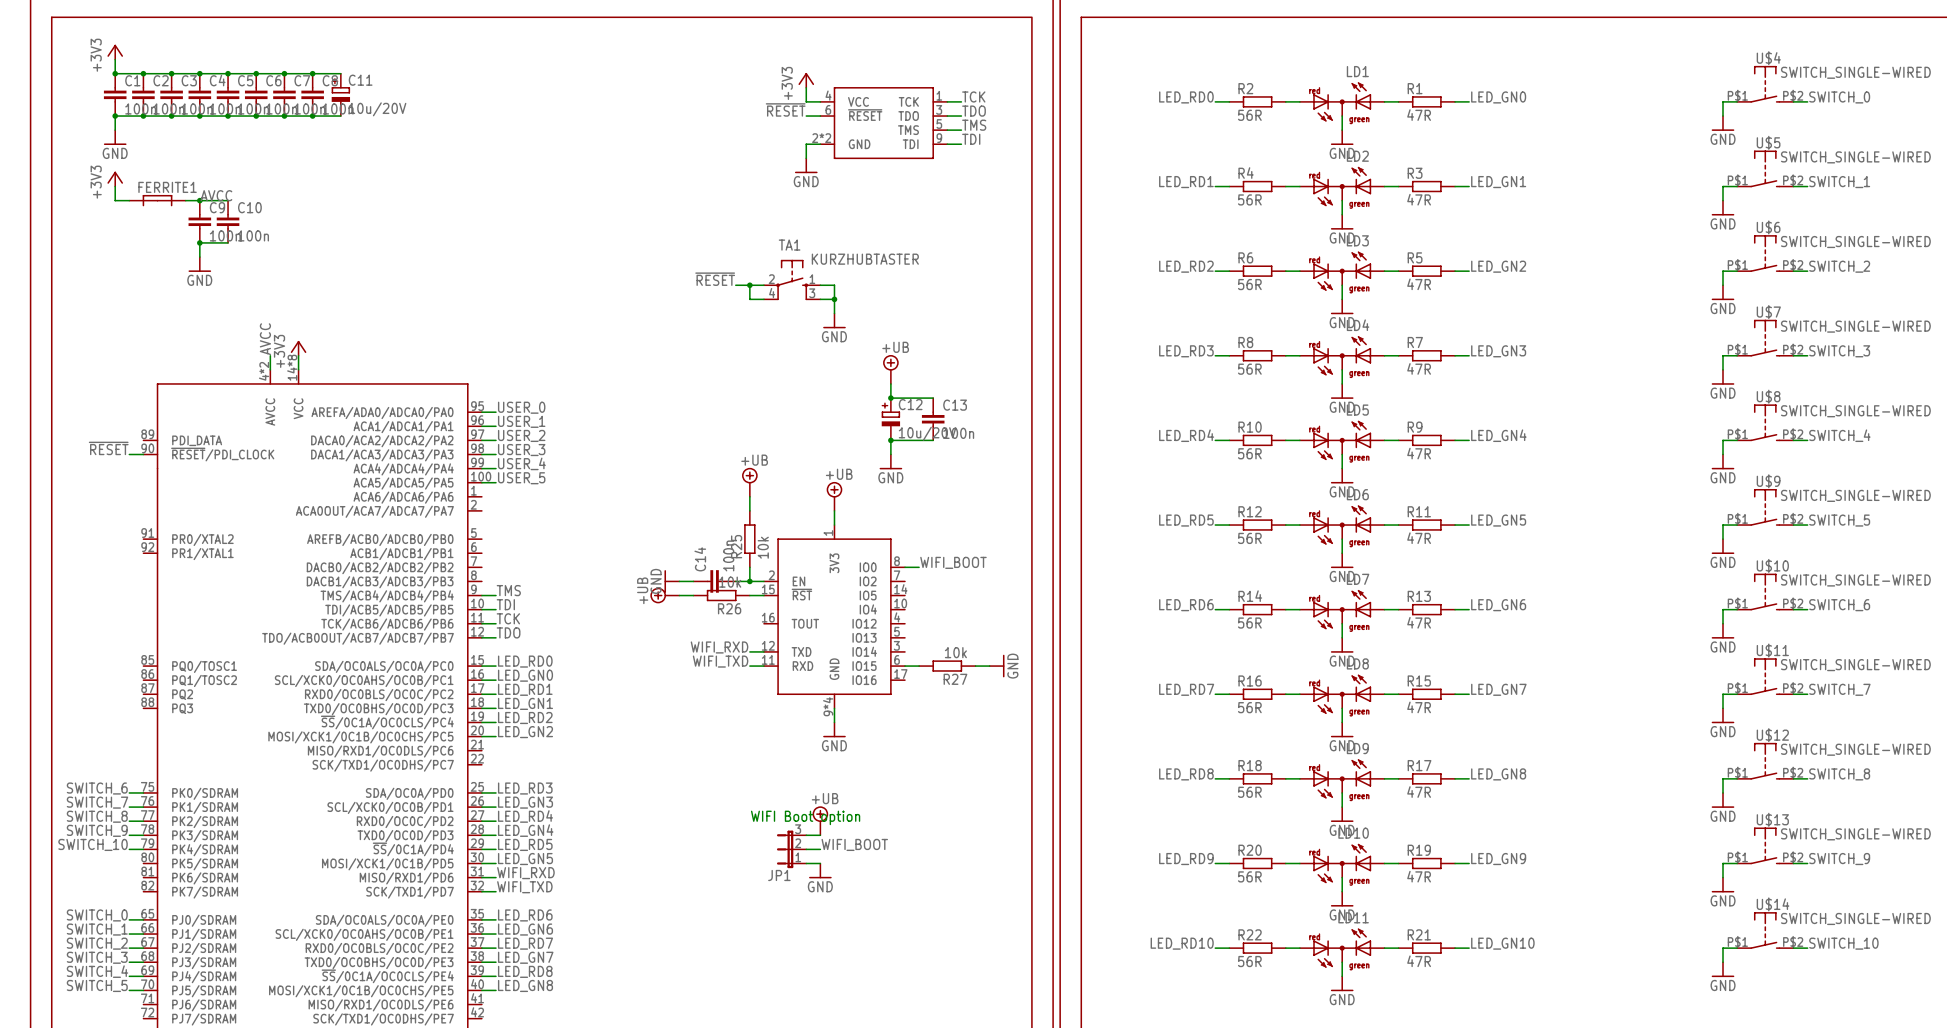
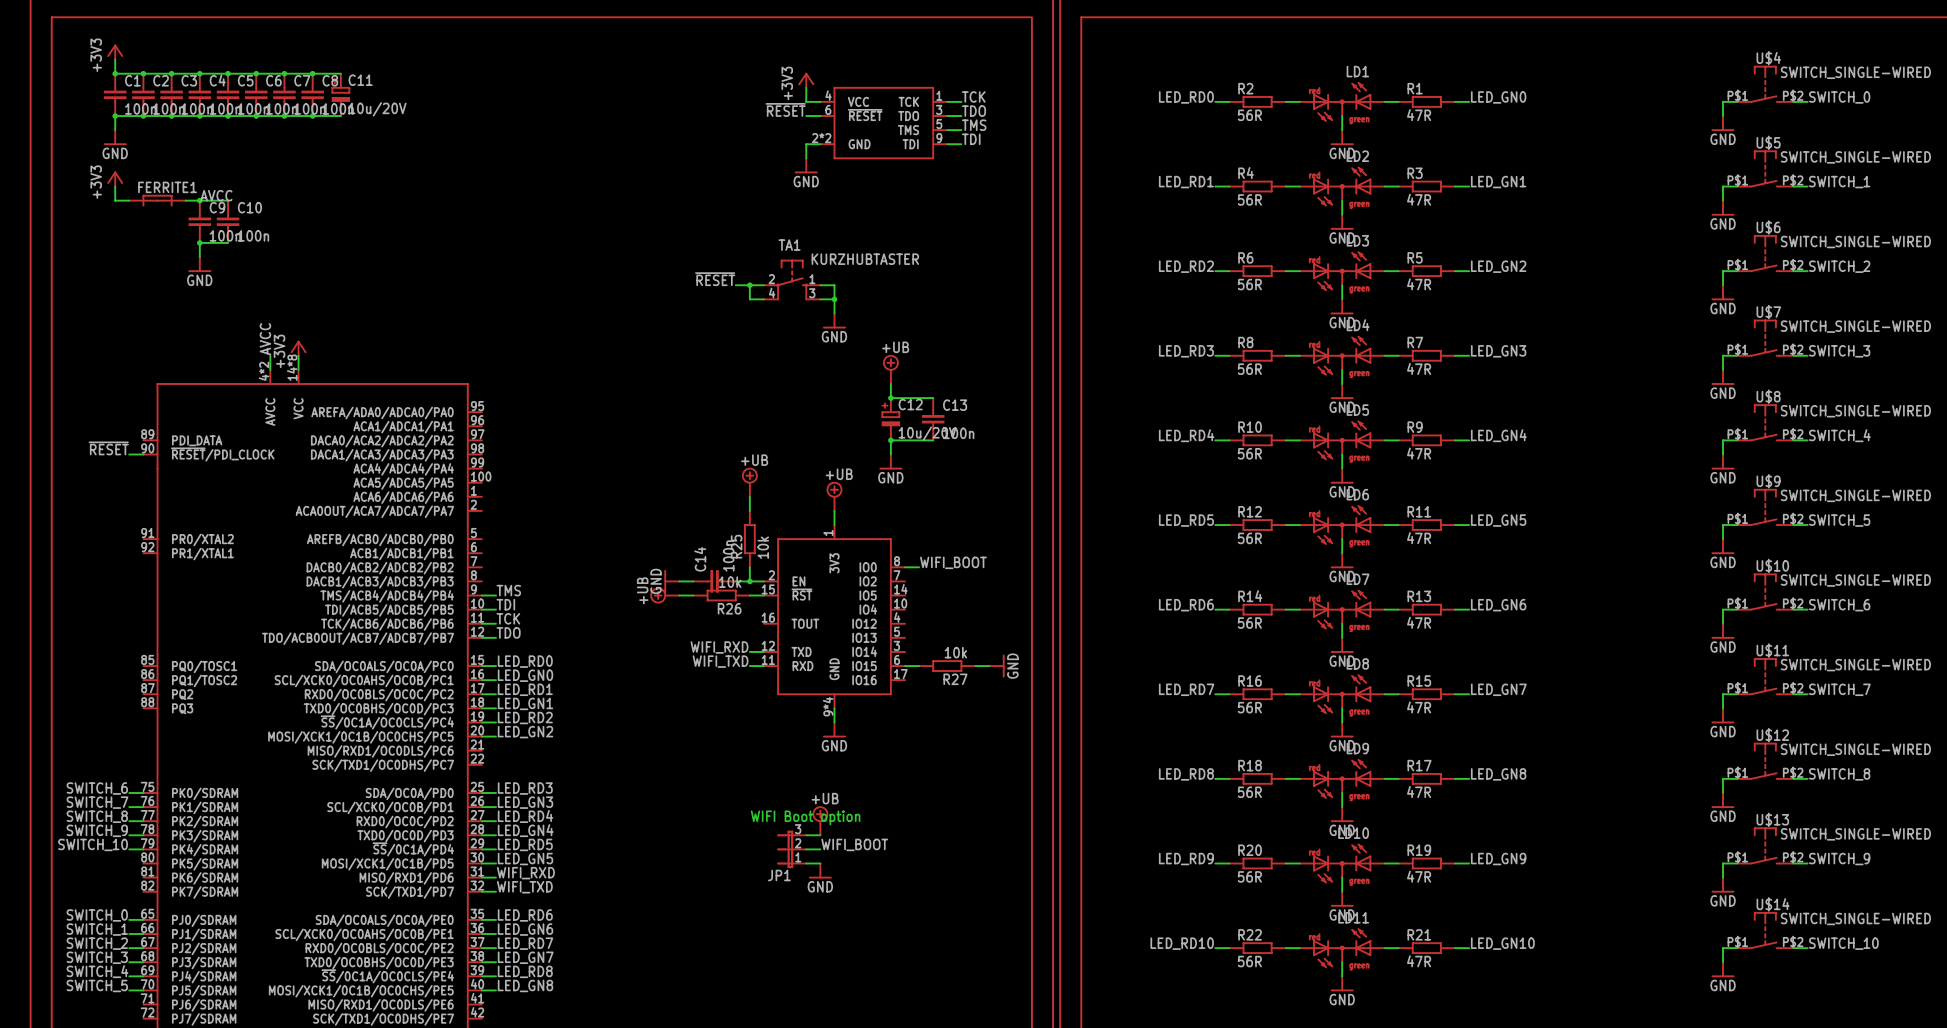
label: USER_0 (521, 407) -> none
wire: (481, 412) (496, 412) -> none
label: USER_1 (521, 421) -> none
wire: (481, 426) (496, 426) -> none
label: USER_2 (521, 435) -> none
wire: (481, 440) (496, 440) -> none
label: USER_3 (521, 450) -> none
wire: (481, 454) (496, 454) -> none
label: USER_4 (521, 463) -> none
wire: (481, 468) (496, 468) -> none
label: USER_5 (521, 478) -> none
wire: (481, 482) (496, 482) -> none

